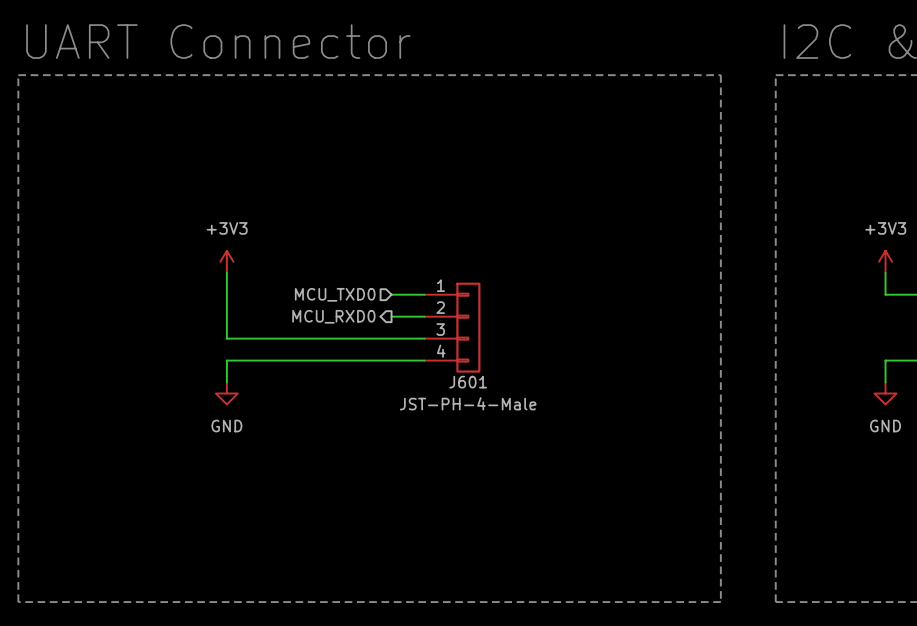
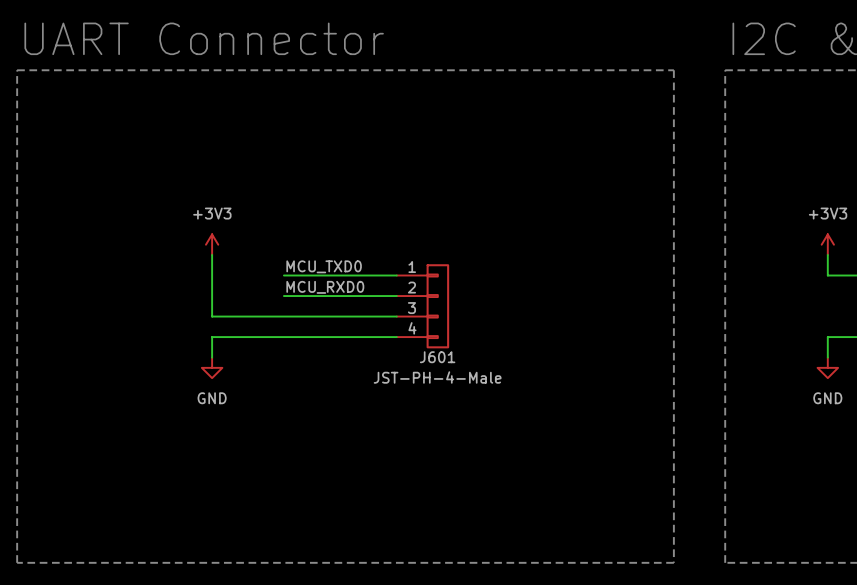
label: none -> MCU_TXD0 (324, 266)
wire: none -> (283, 275) (366, 275)
hierarchical label: MCU_TXD0 (335, 294) -> none
label: none -> MCU_RXD0 (325, 287)
wire: none -> (283, 296) (366, 296)
hierarchical label: MCU_RXD0 (333, 316) -> none

